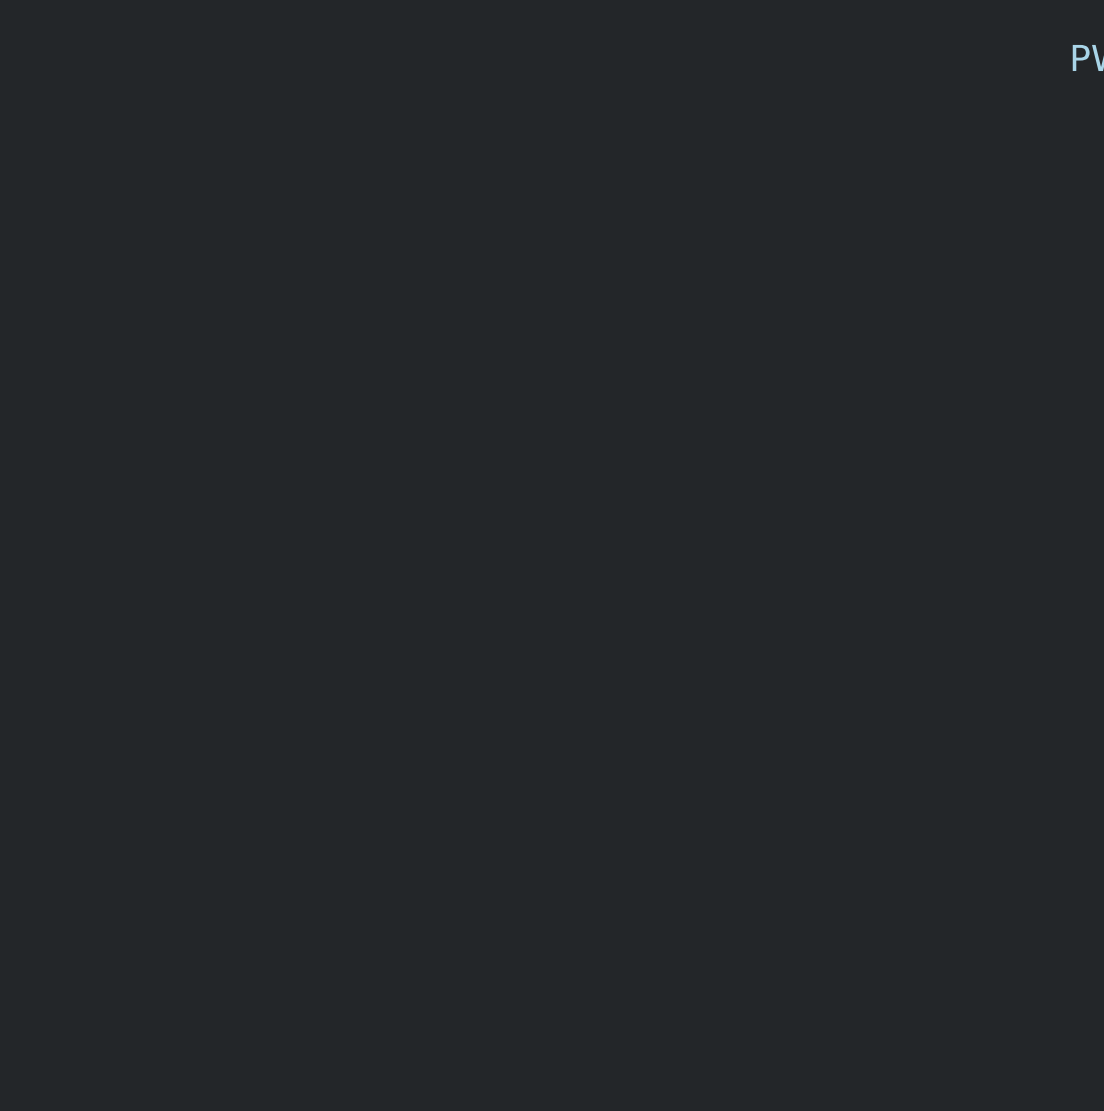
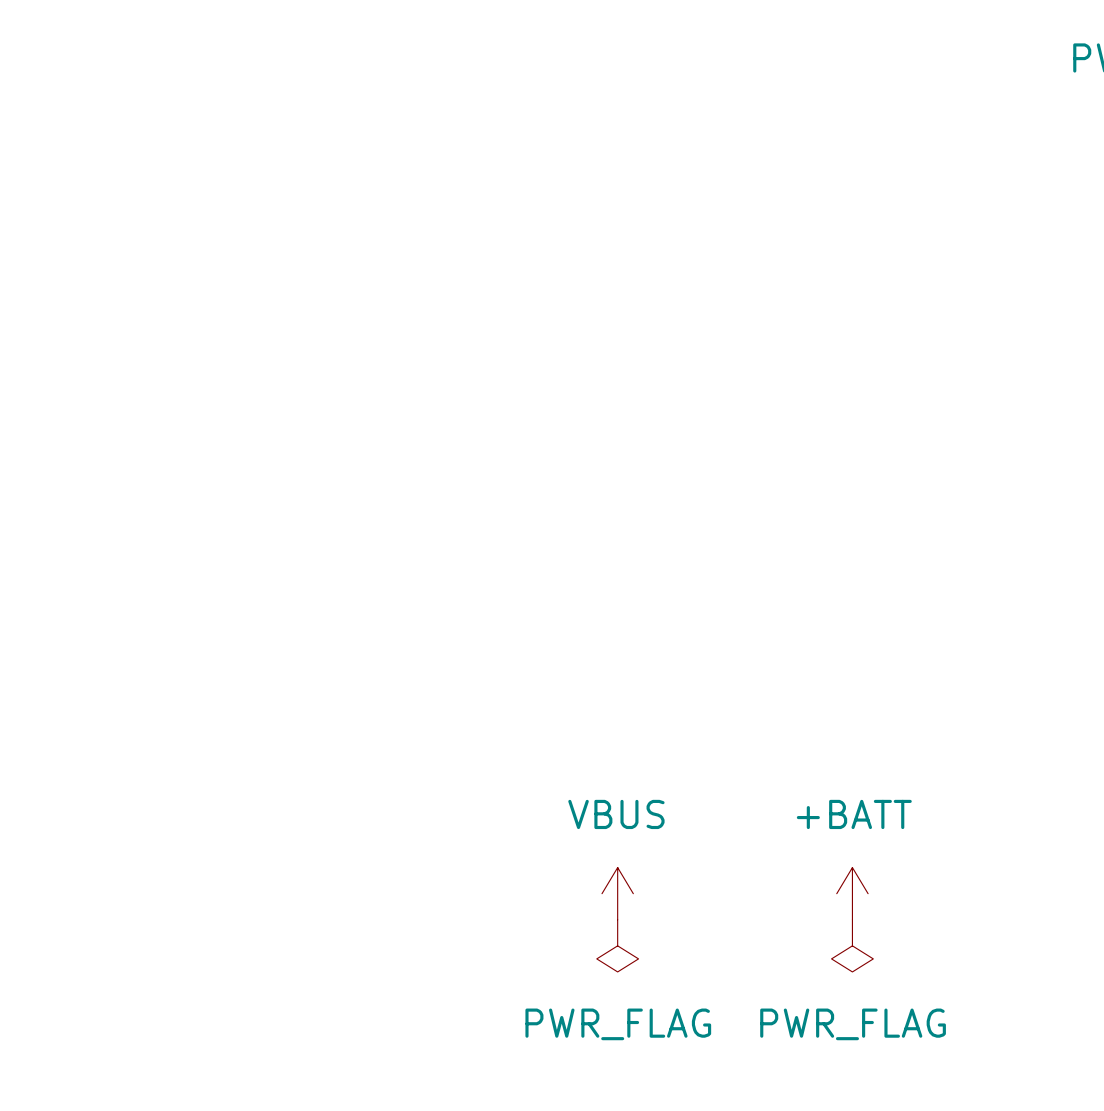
power symbol: none -> VBUS (617, 893)
power symbol: none -> +BATT (852, 893)
power symbol: none -> PWR_FLAG (617, 945)
power symbol: none -> PWR_FLAG (852, 945)

